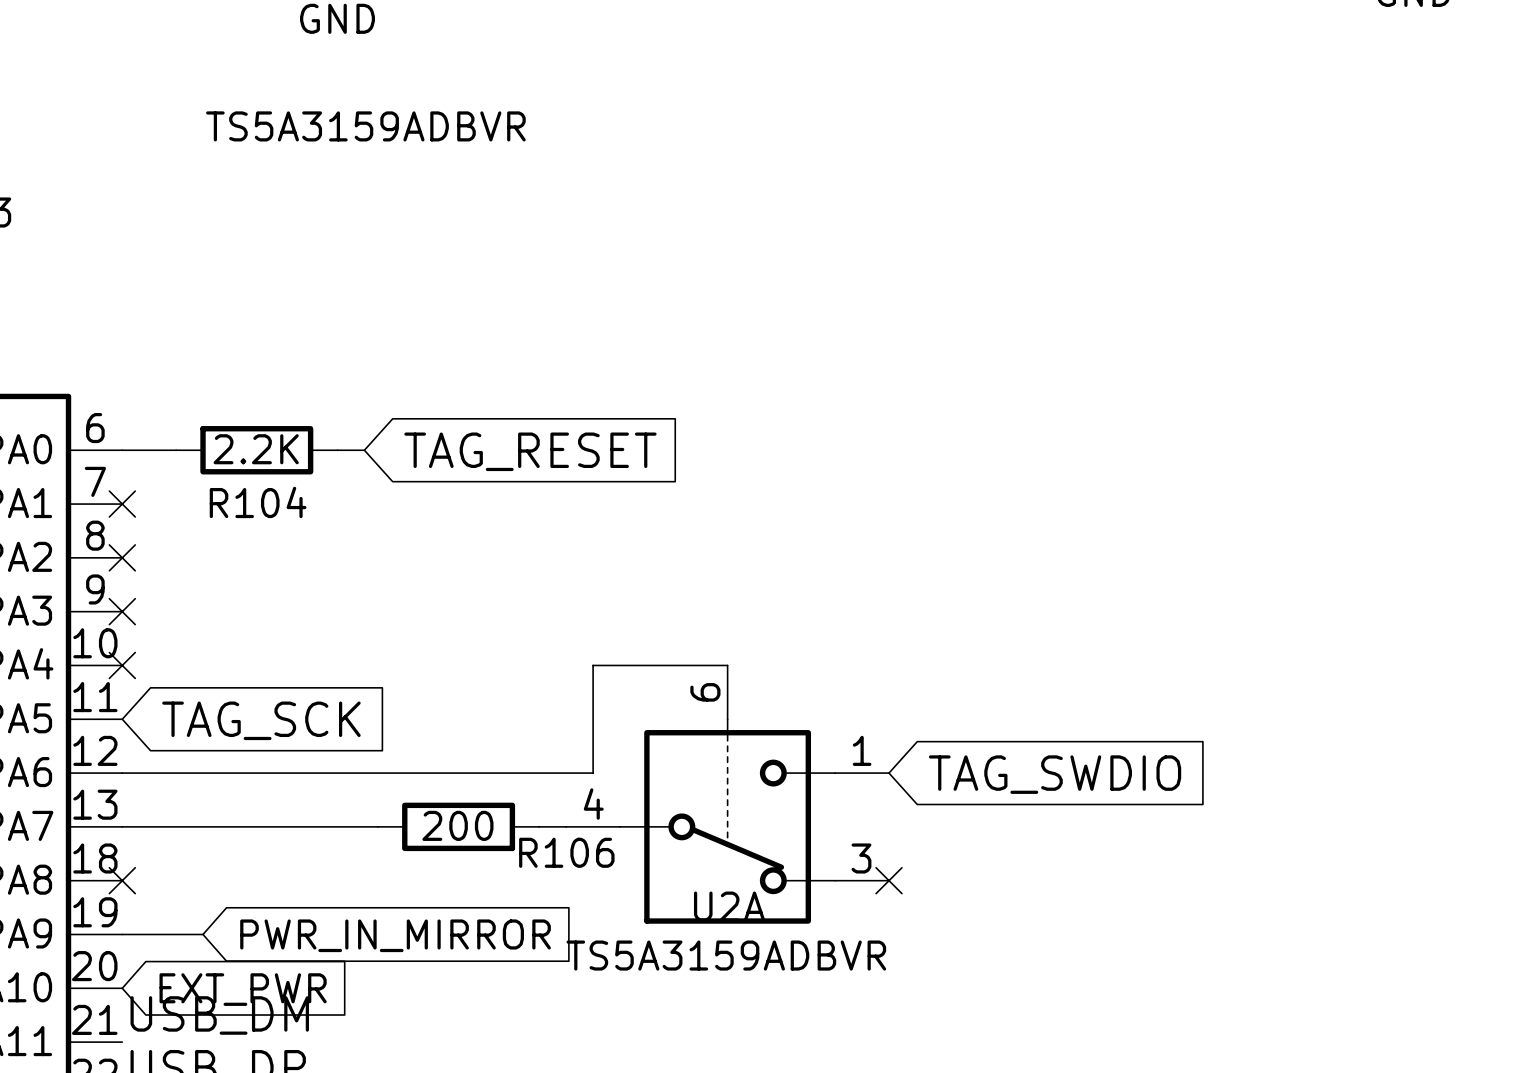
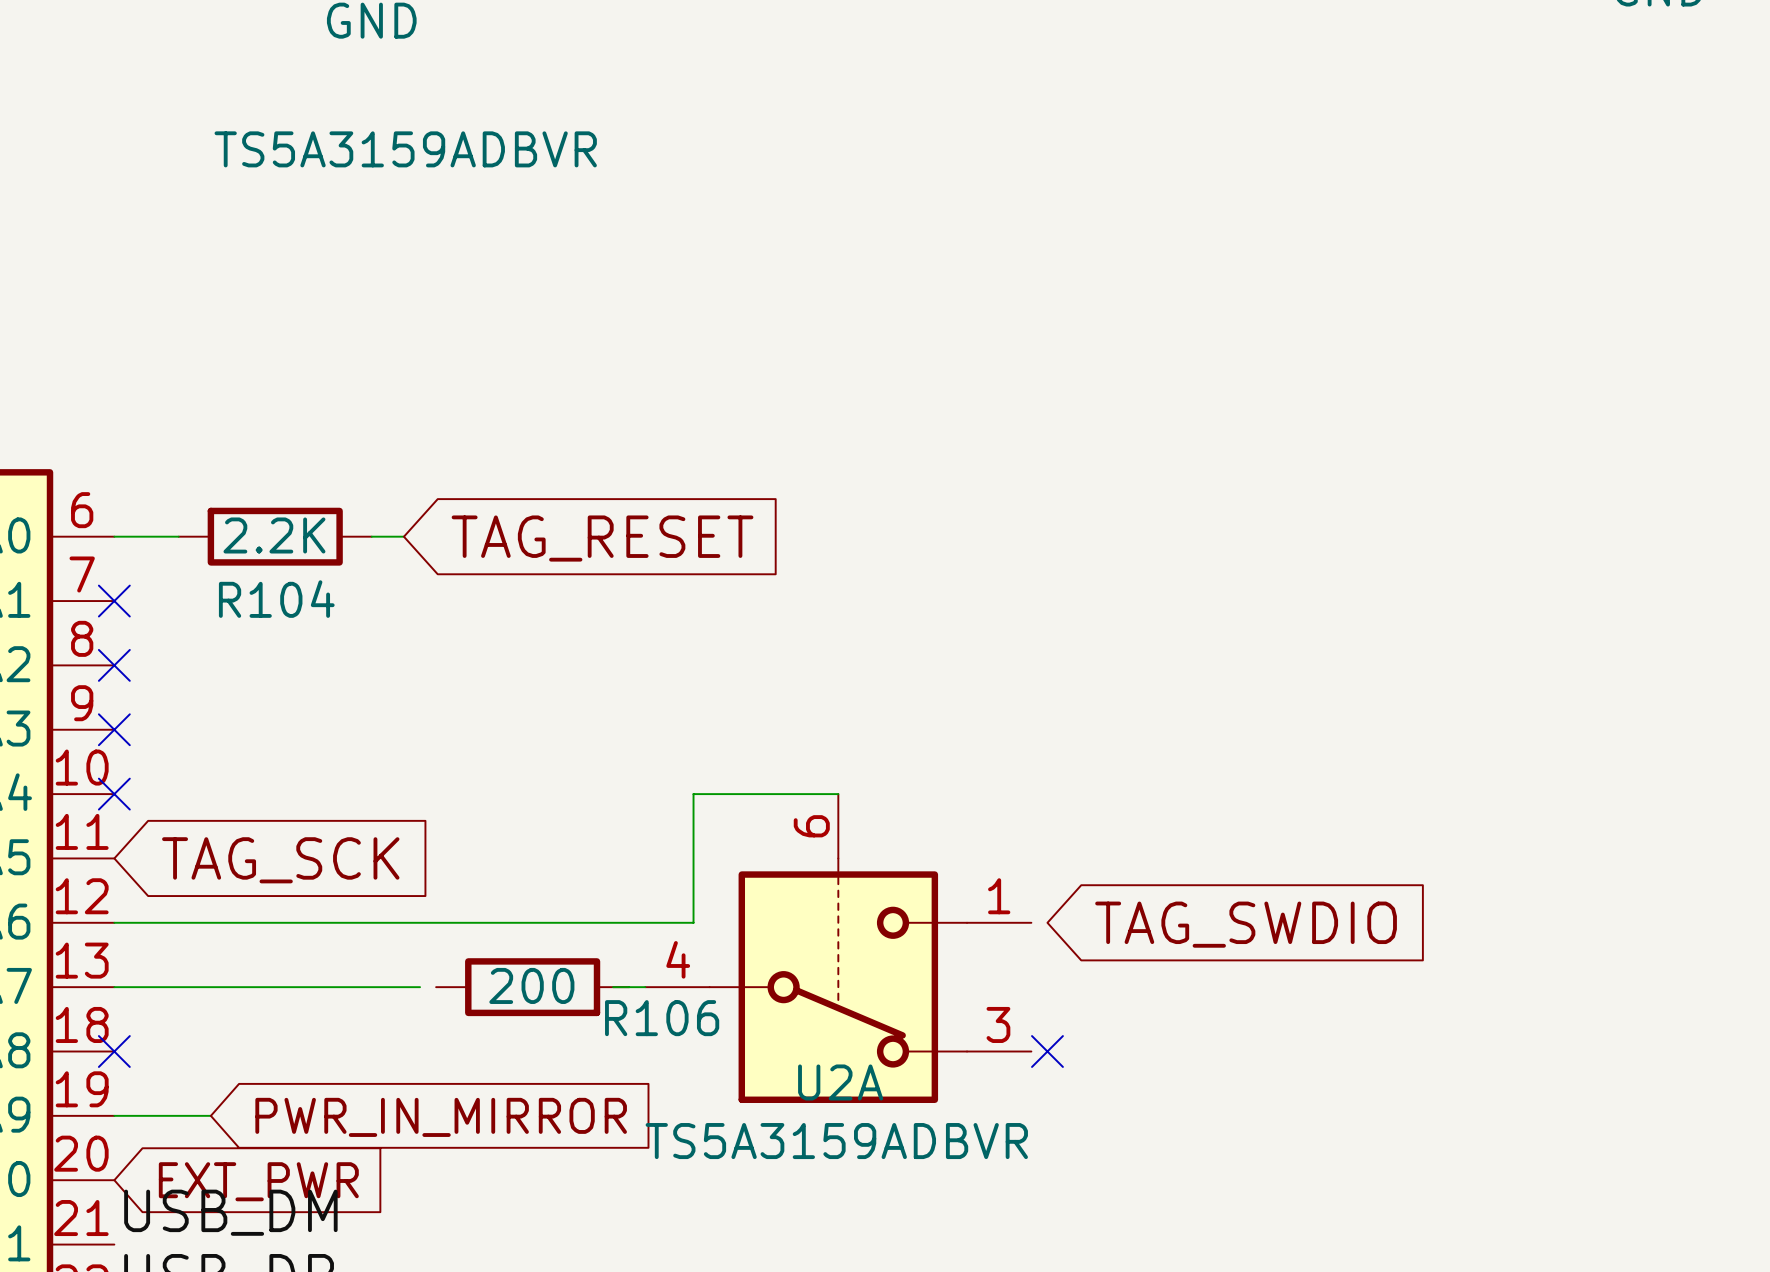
wire: (606, 665) (593, 665) (593, 773) -> (693, 794) (693, 922) (677, 922)
global label position: TAG_SWDIO (1055, 774) -> TAG_SWDIO (1246, 924)
R106 position: (458, 826) -> (532, 987)
no-connect mark position: (889, 880) -> (1047, 1051)

